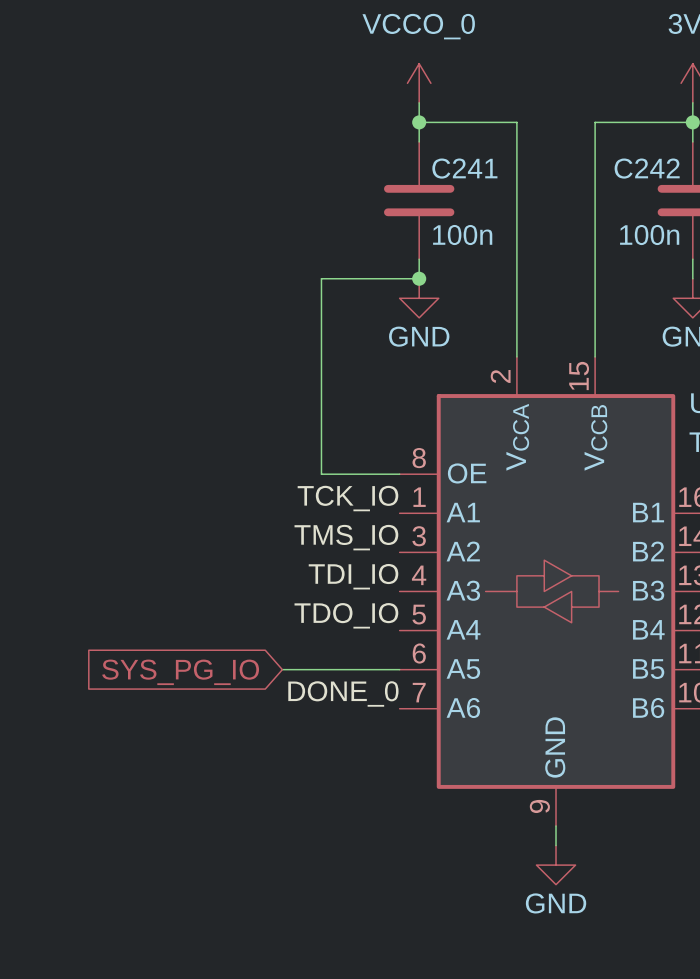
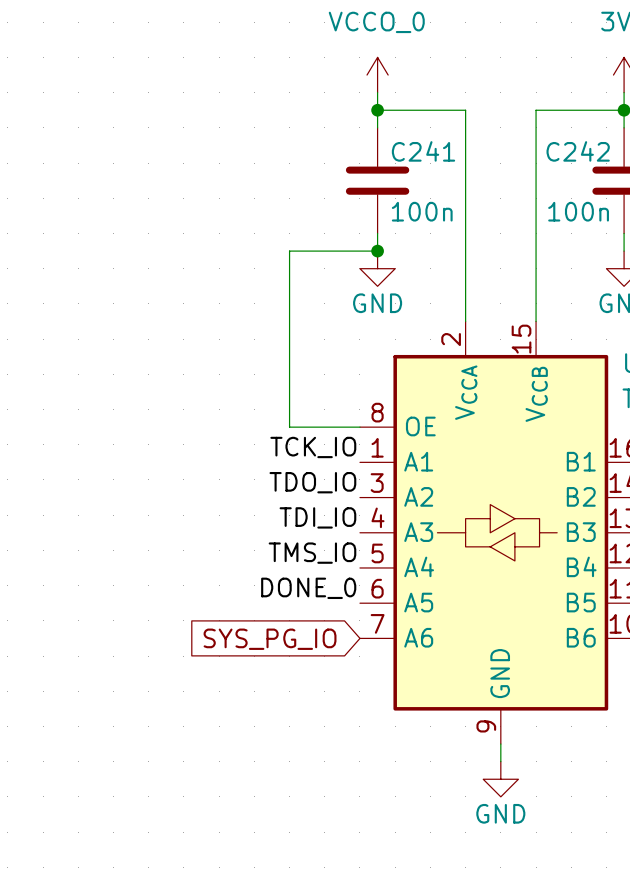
label: TMS_IO (346, 537) -> TDO_IO (312, 482)
label: TDO_IO (346, 615) -> TMS_IO (312, 553)
wire: (282, 669) (399, 669) -> none
global label position: SYS_PG_IO (180, 672) -> SYS_PG_IO (270, 639)
label position: DONE_0 (343, 693) -> DONE_0 (308, 588)

